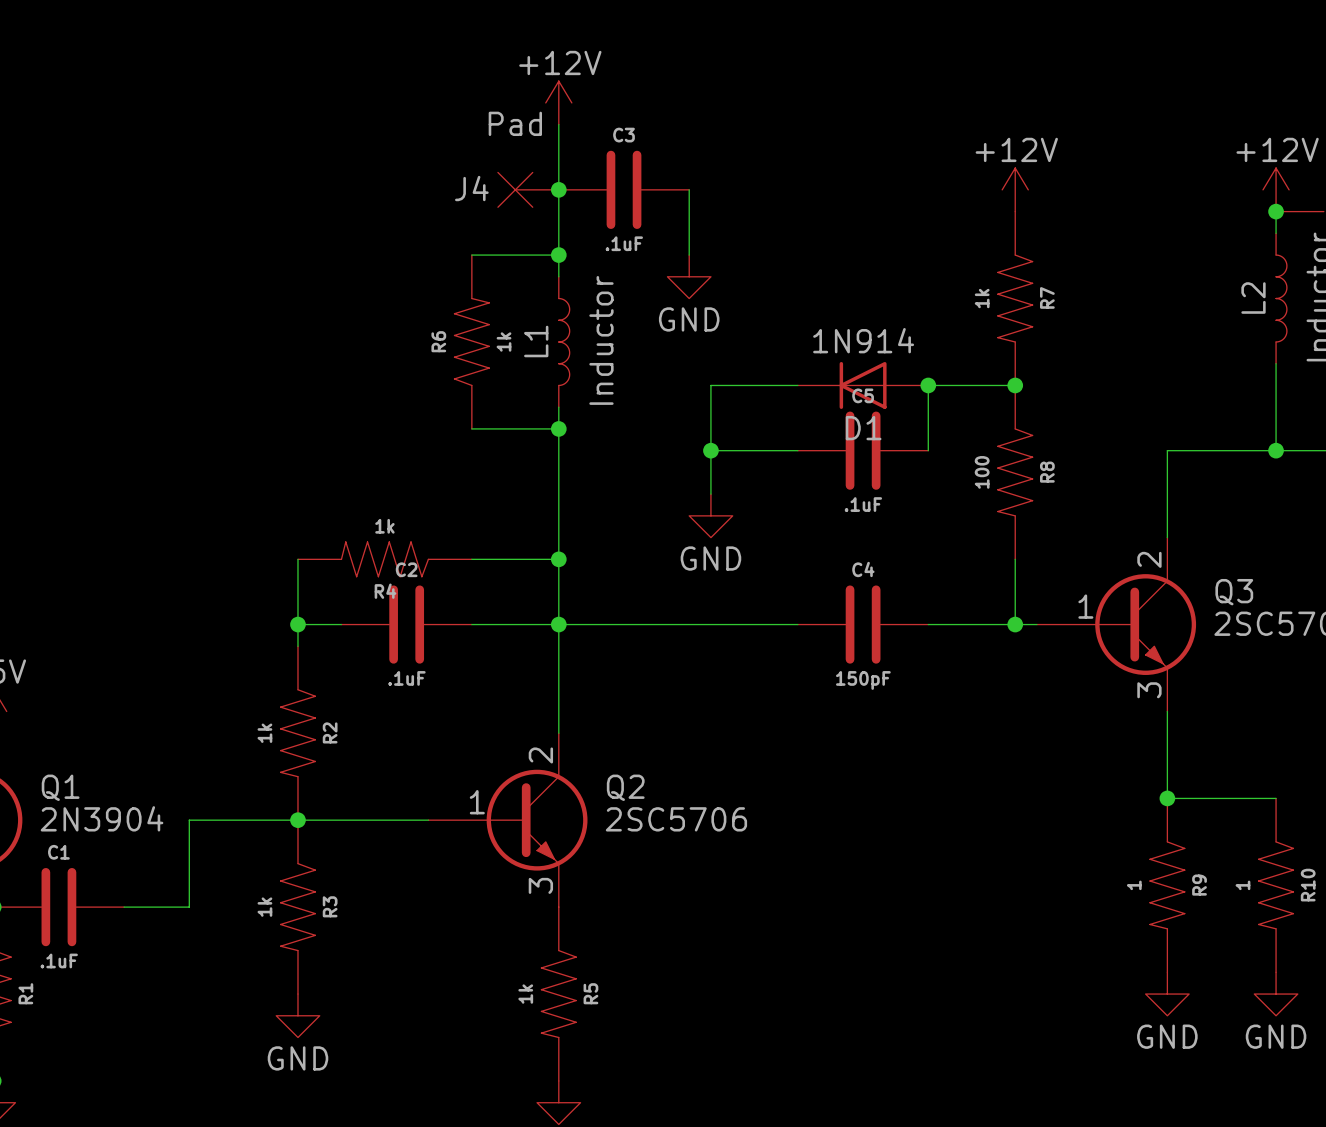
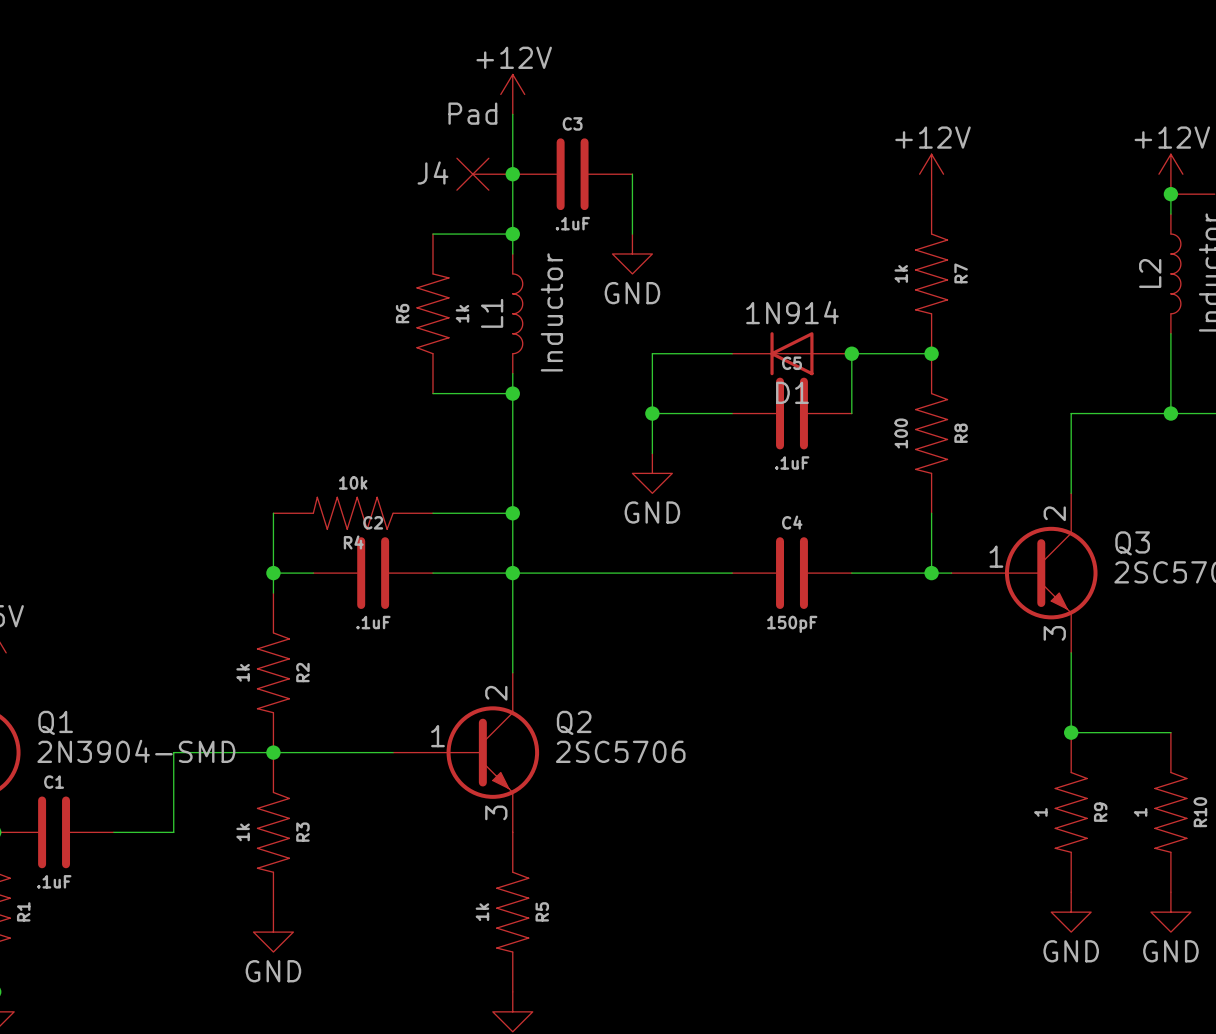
R4 value: 1k (384, 526) -> 10k (353, 482)
Q1 value: 2N3904 (102, 818) -> 2N3904-SMD (136, 751)

